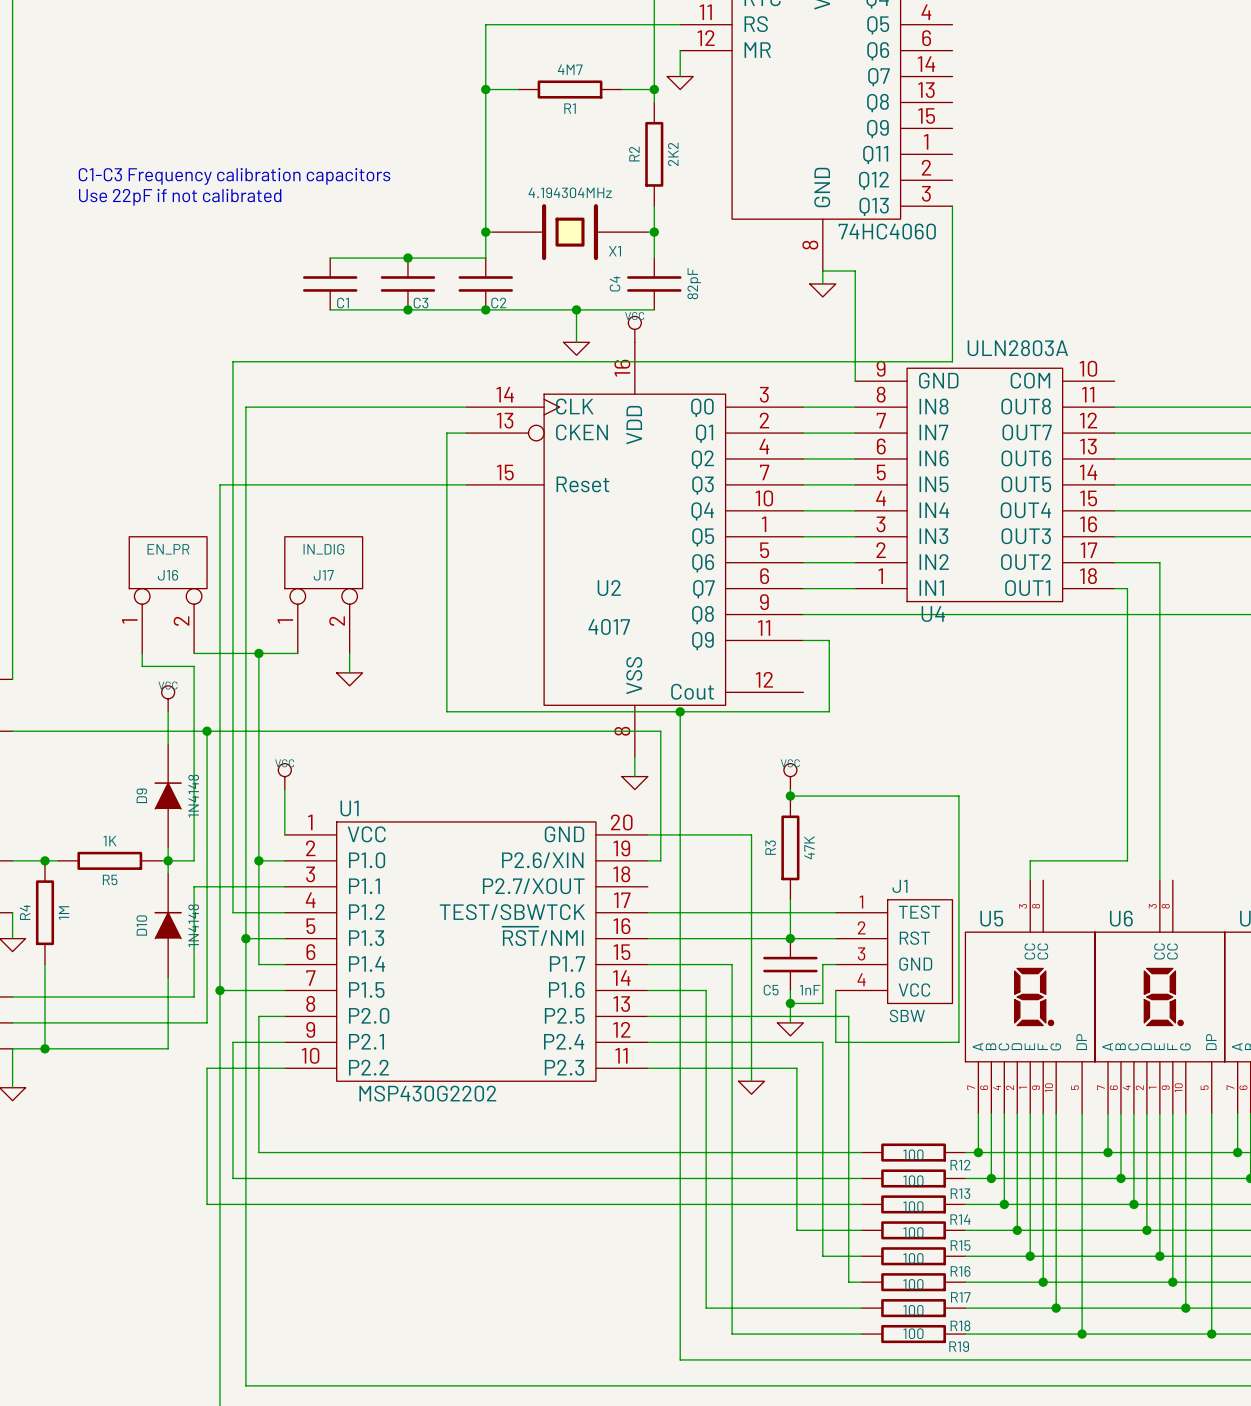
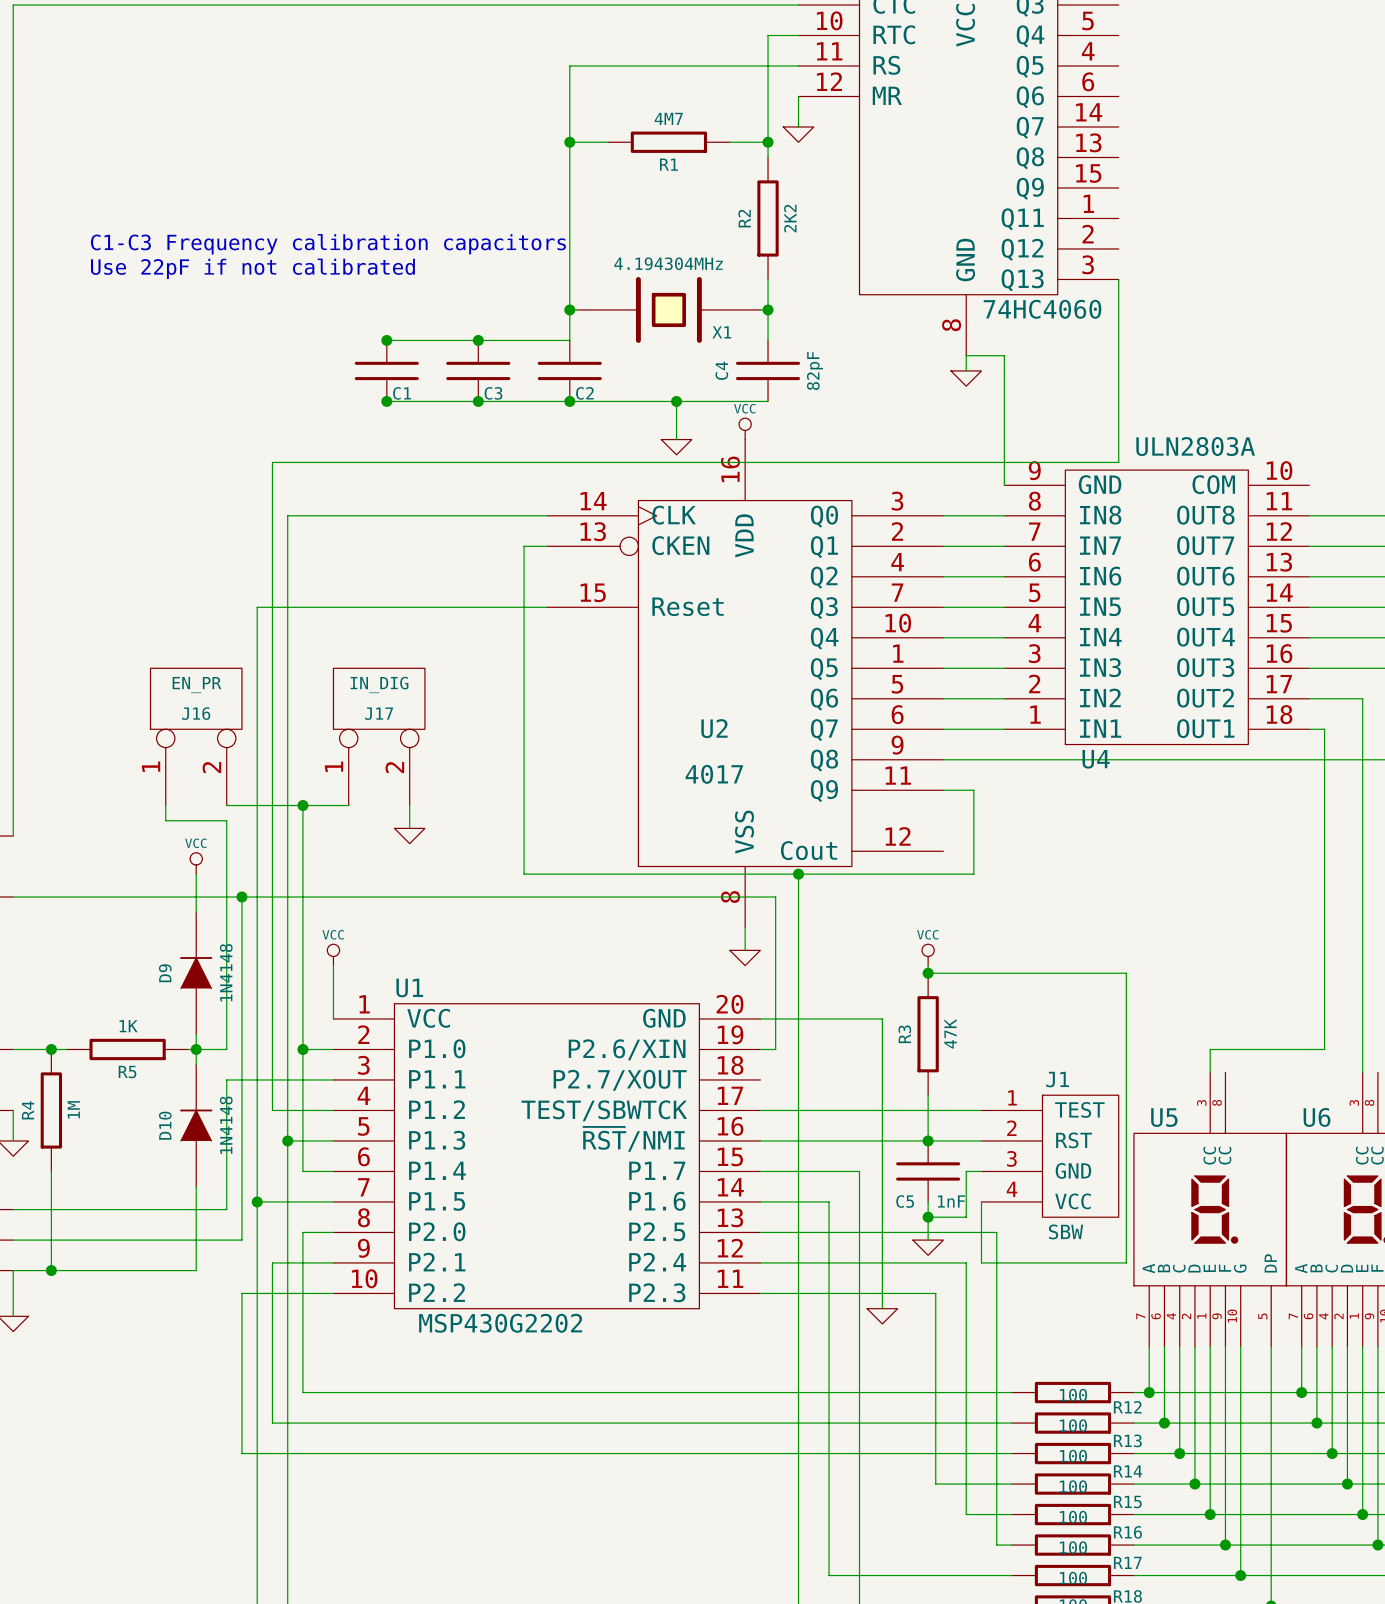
junction: none -> (386, 340)
junction: none -> (386, 401)
power symbol shape: [628, 316, 642, 343] -> [739, 418, 752, 440]
power symbol shape: [161, 685, 175, 712] -> [190, 852, 203, 875]
power symbol shape: [278, 763, 292, 790] -> [327, 944, 340, 966]
power symbol shape: [783, 763, 797, 790] -> [922, 944, 935, 966]

